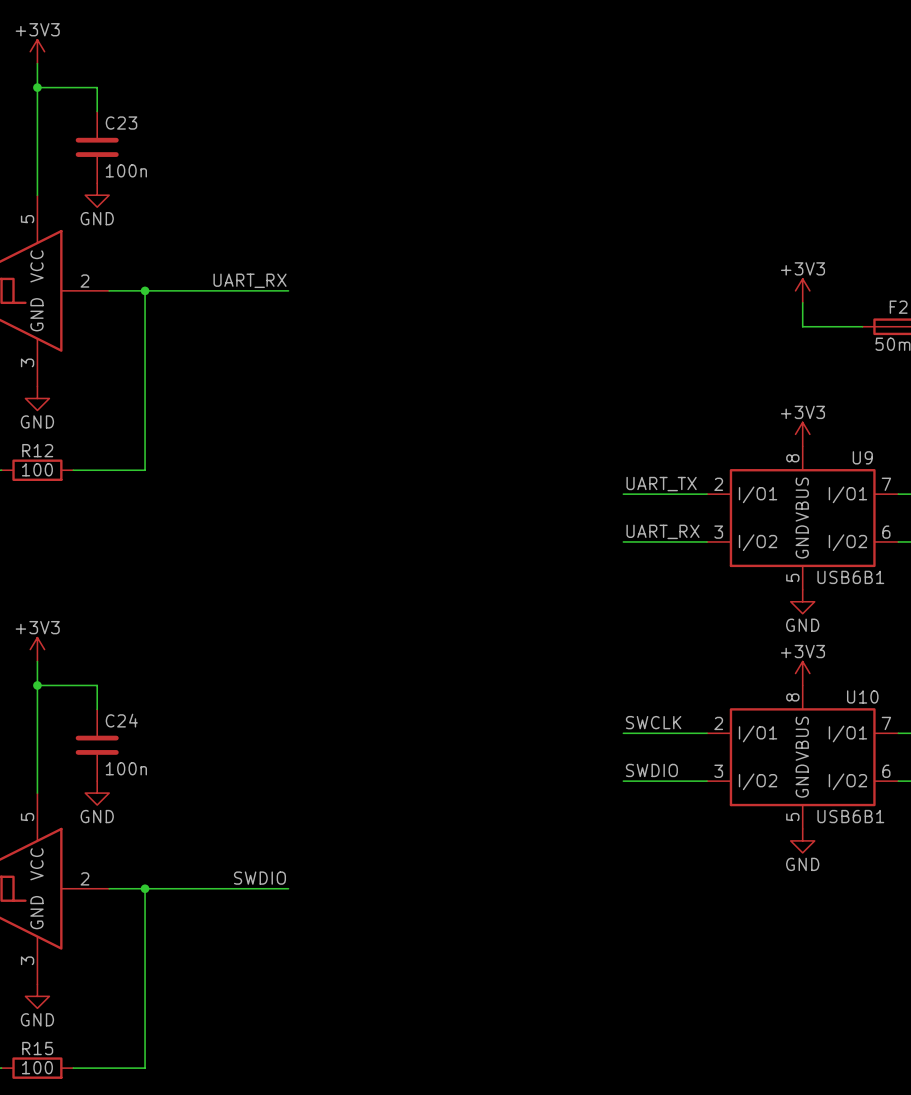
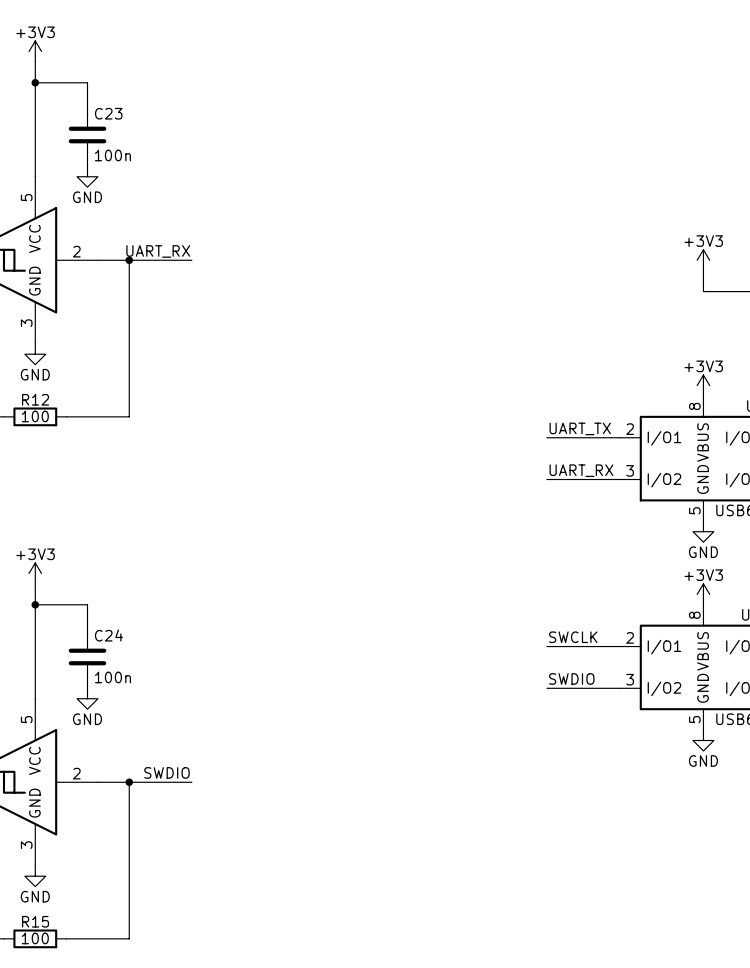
label position: UART_RX (250, 280) -> UART_RX (158, 251)
wire: (216, 290) (288, 290) -> none
label position: SWDIO (259, 878) -> SWDIO (166, 772)
wire: (216, 888) (288, 888) -> none

